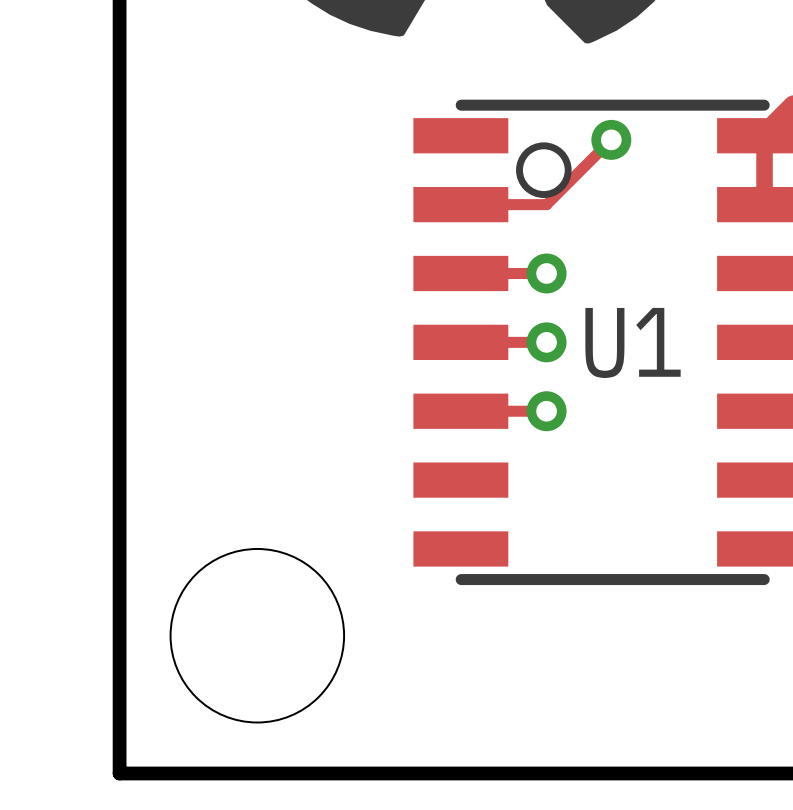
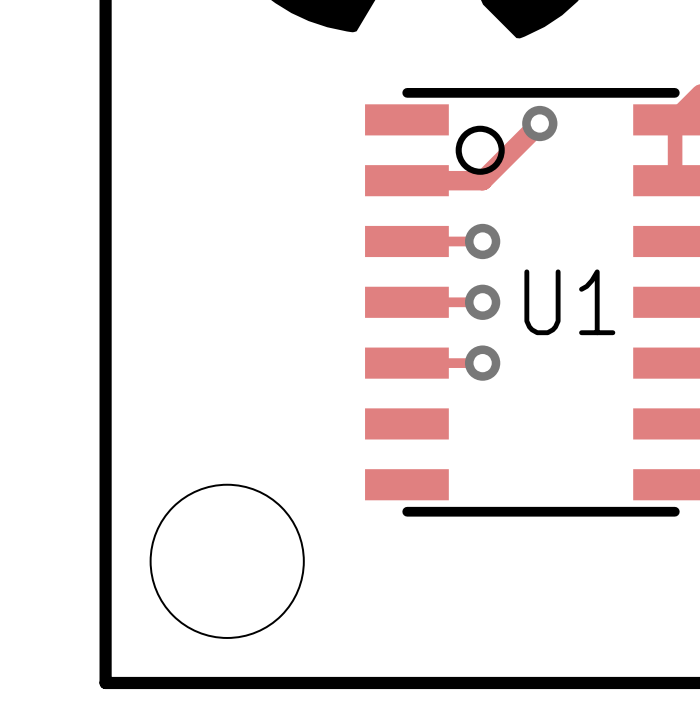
track width: thin (611, 139) (546, 204) (460, 204) -> thick (539, 123) (482, 180) (406, 180)

